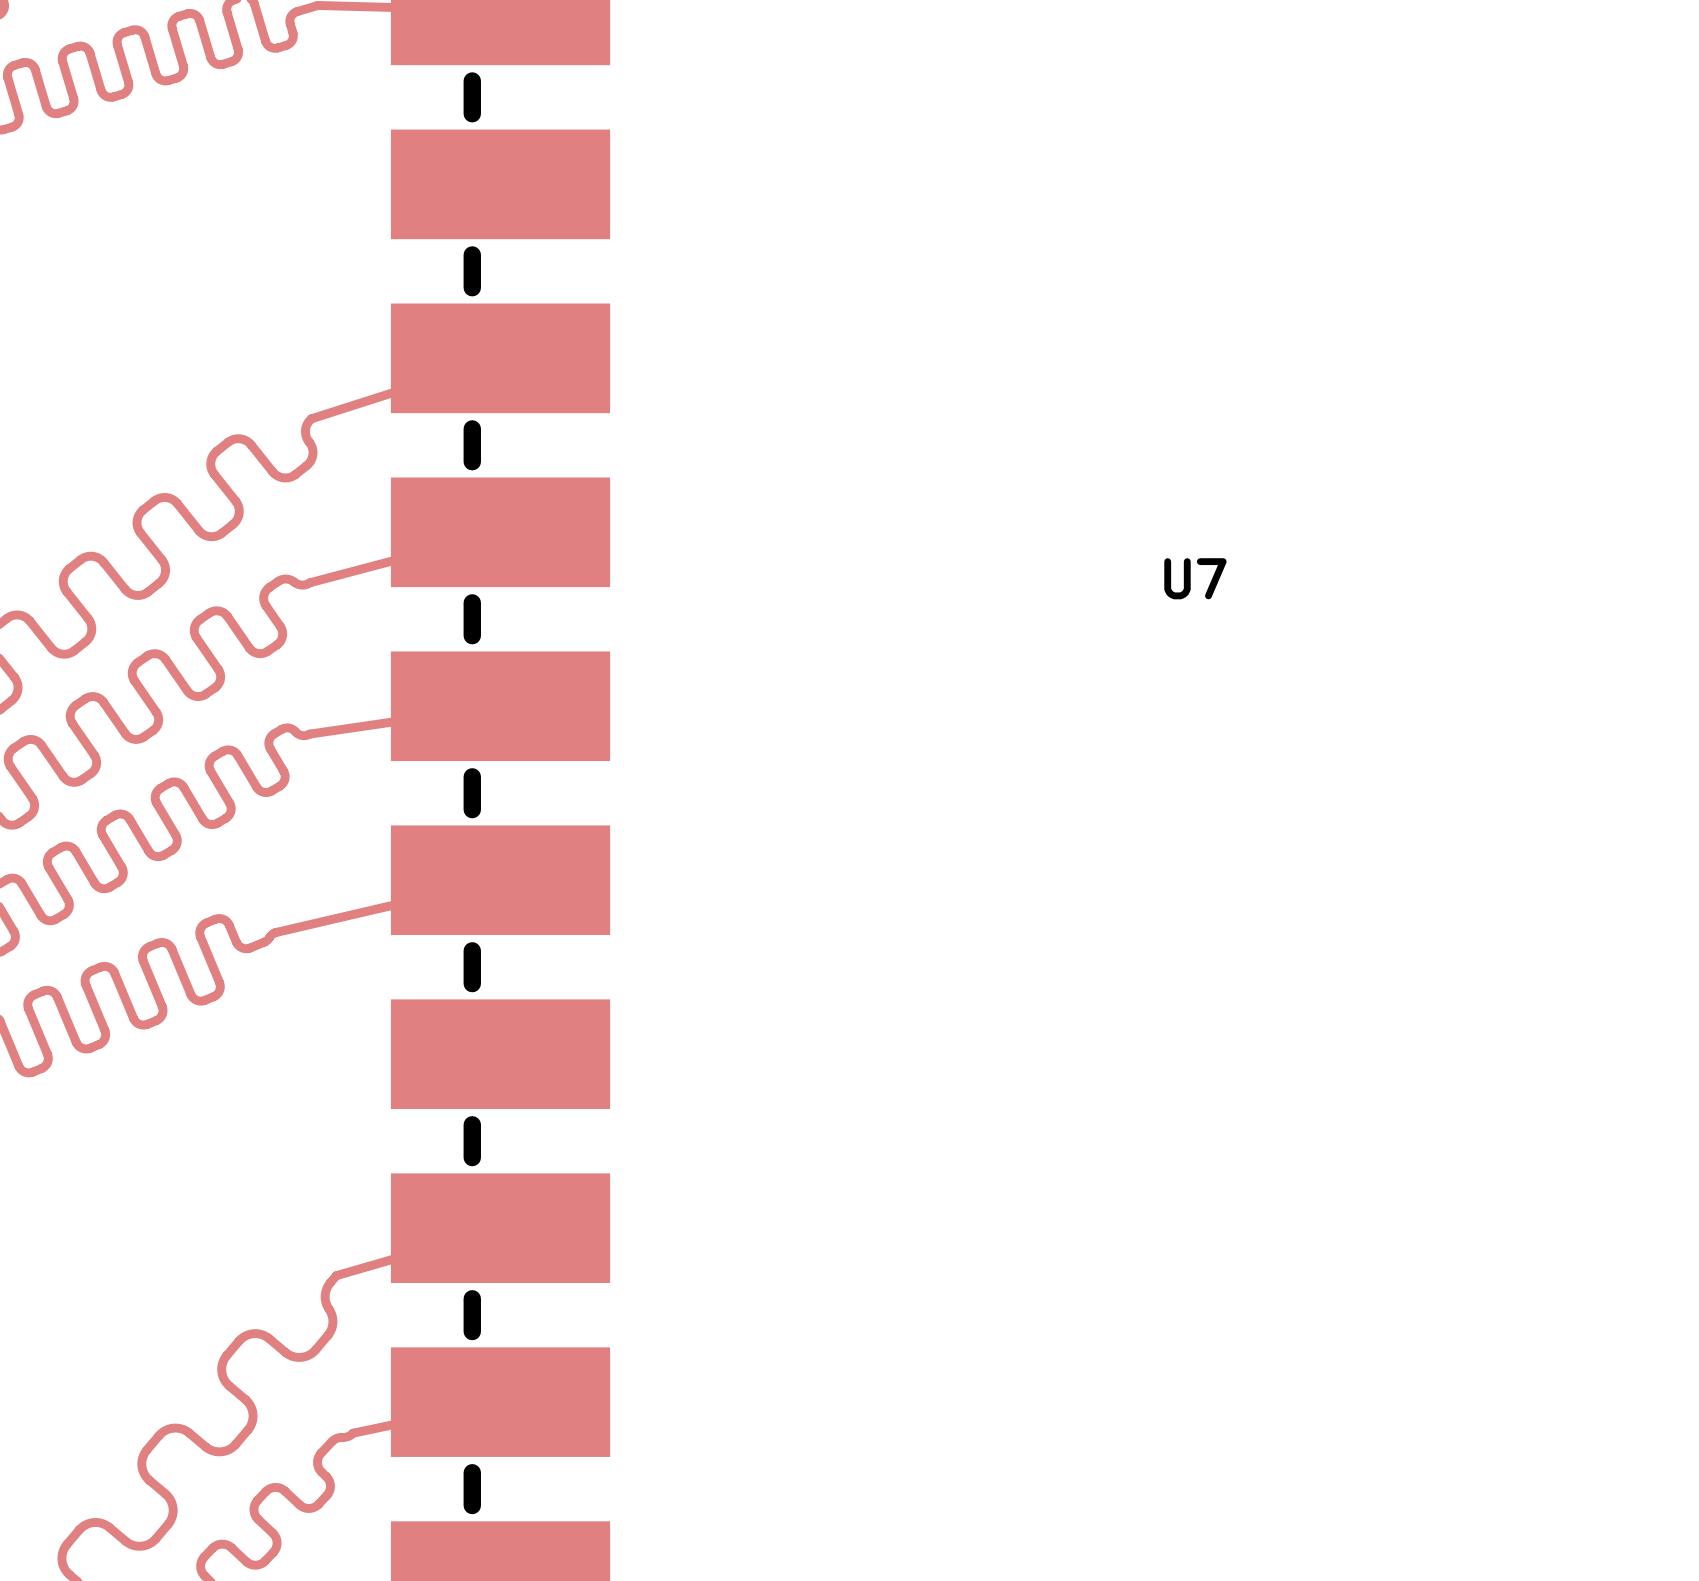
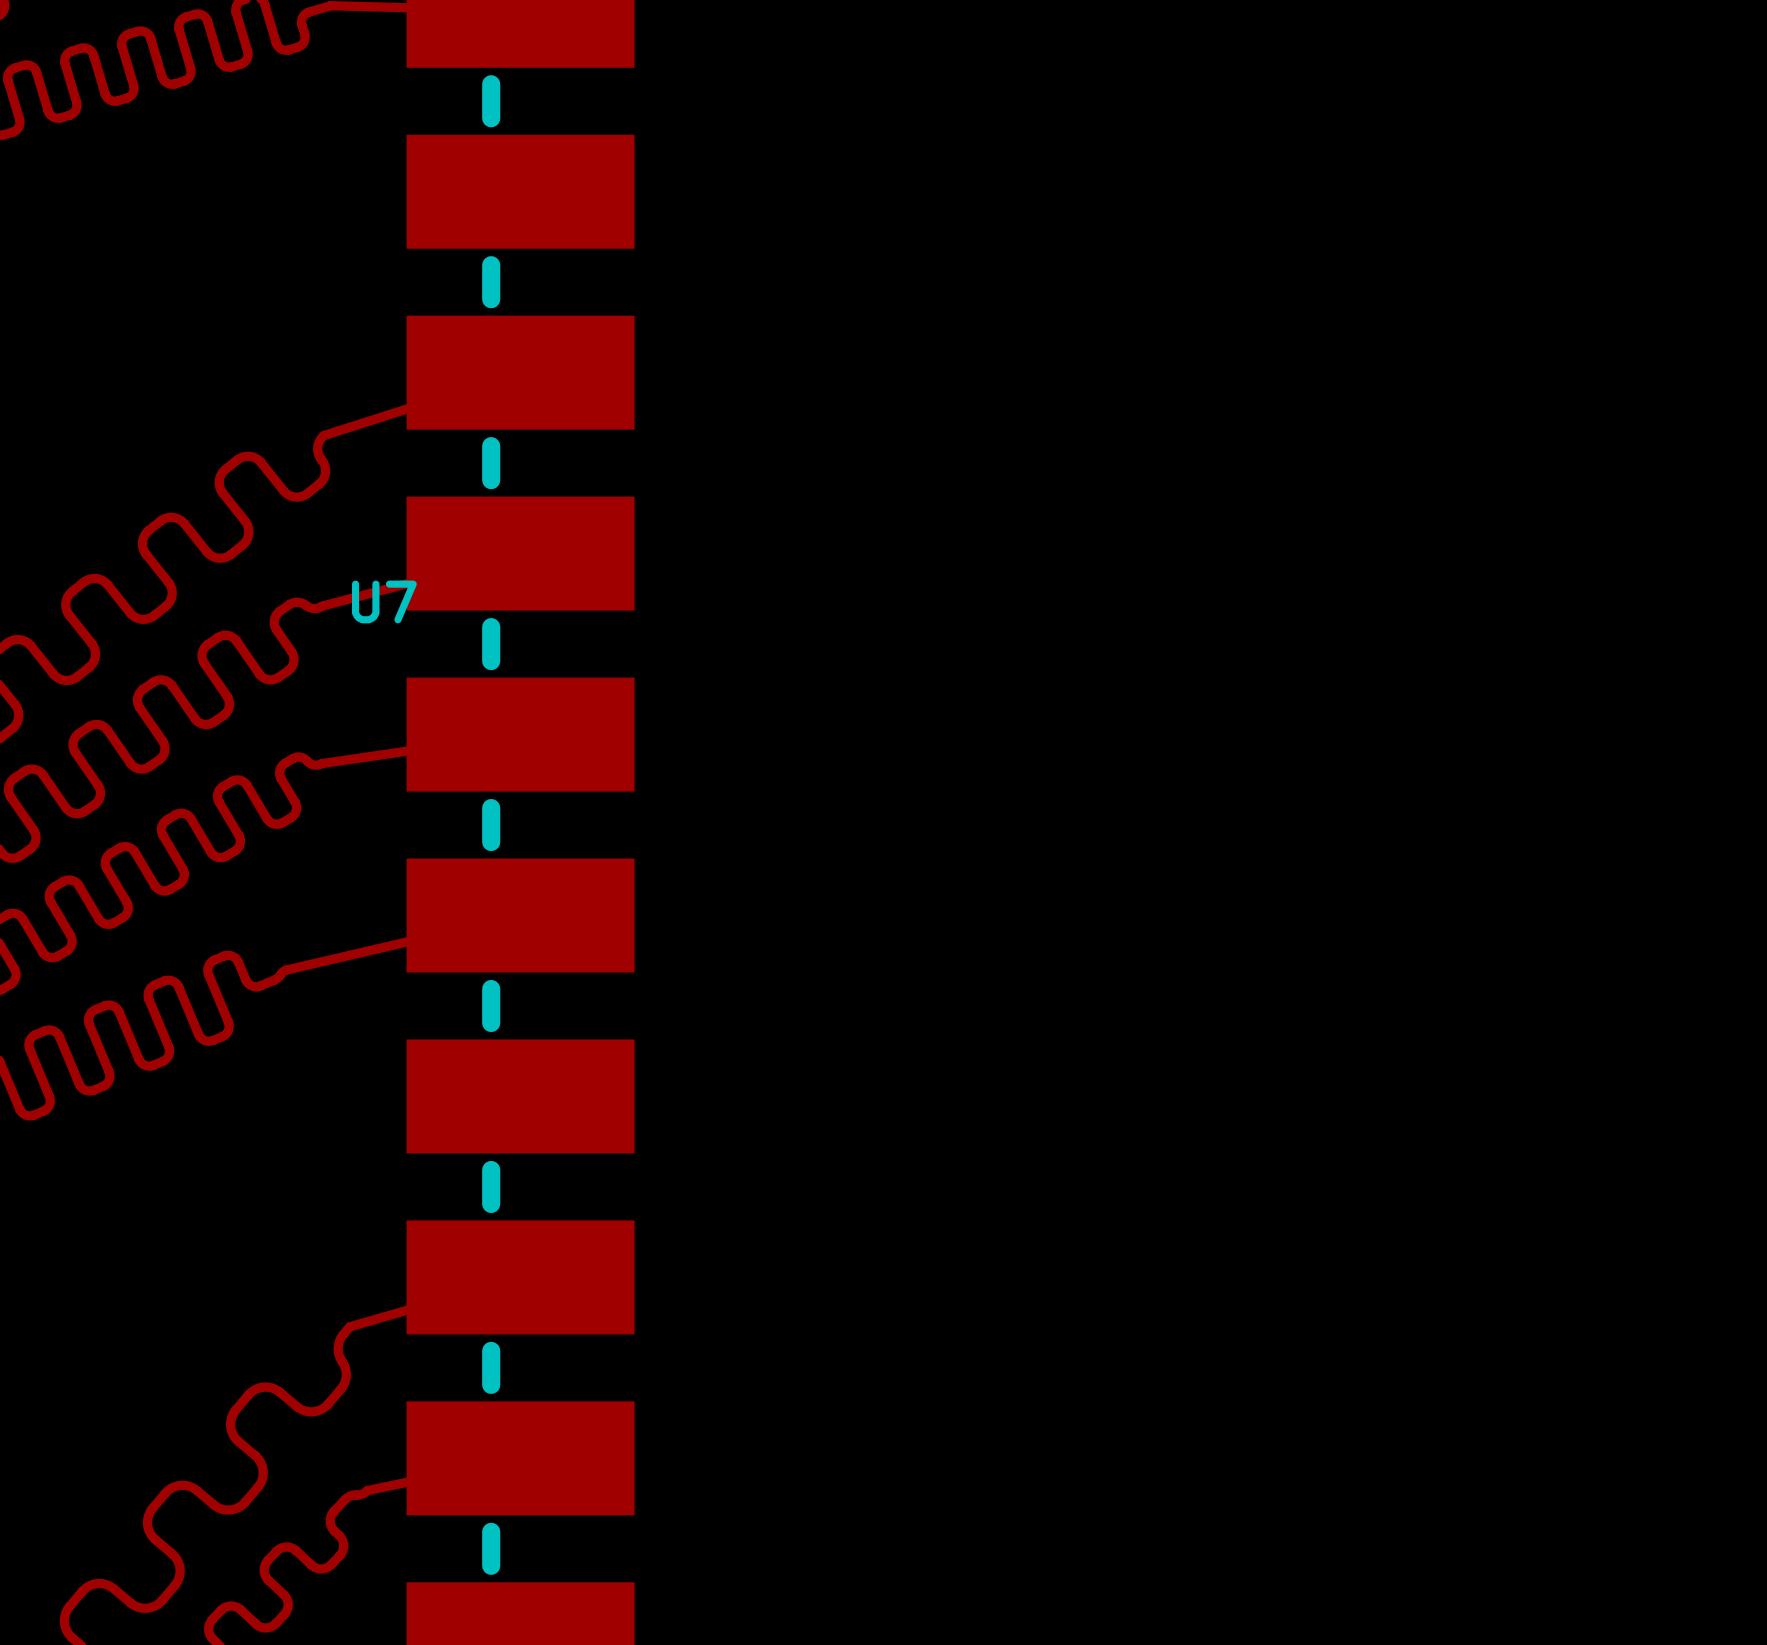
U7 name position: U7 (1195, 578) -> U7 (384, 601)

